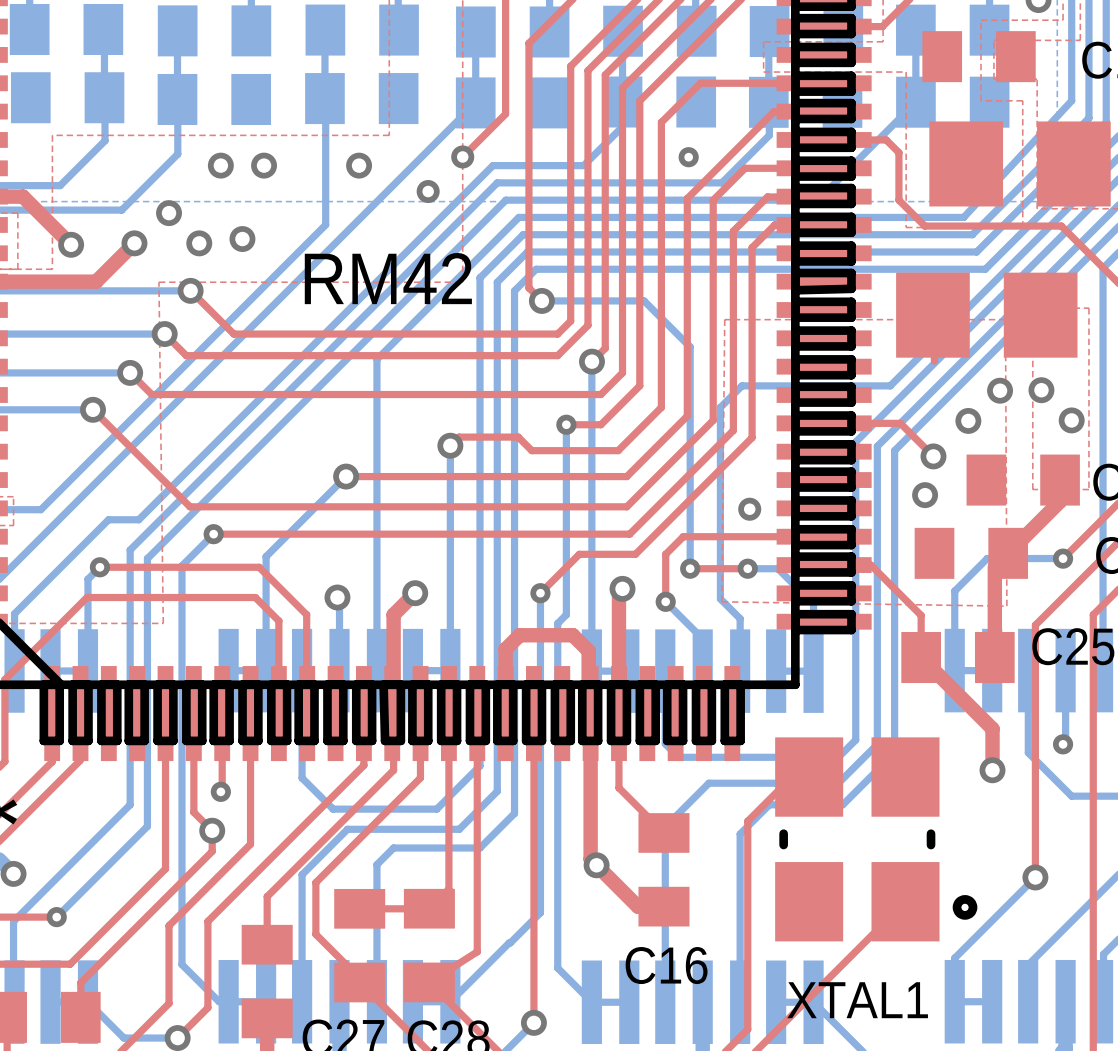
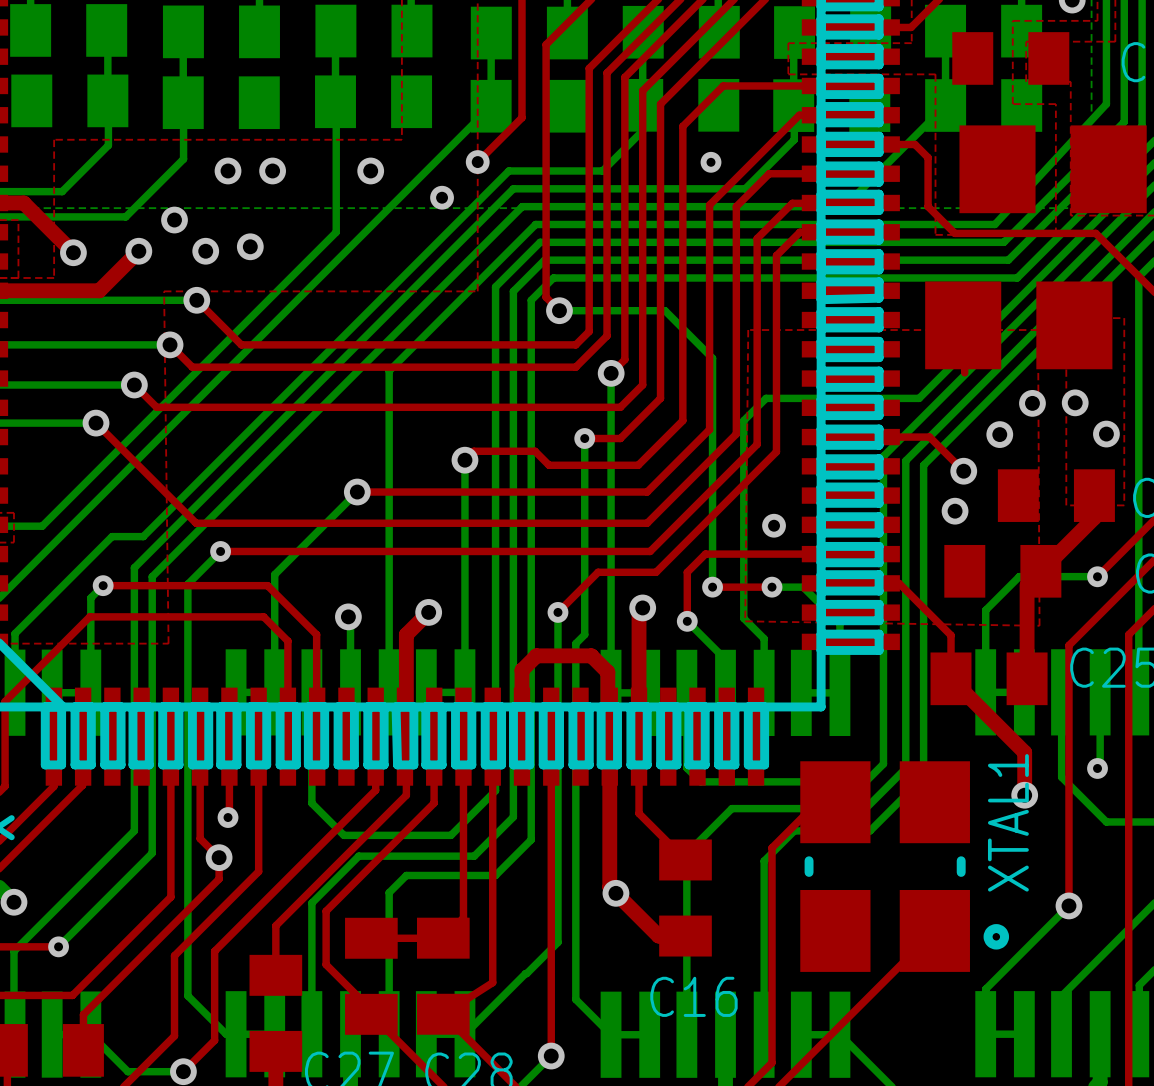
text: RM42 (388, 278) -> none
XTAL1 name rotation: 0° (857, 1000) -> 90° counterclockwise (1008, 822)
XTAL1 name position: XTAL1 (857, 1000) -> XTAL1 (1008, 822)

